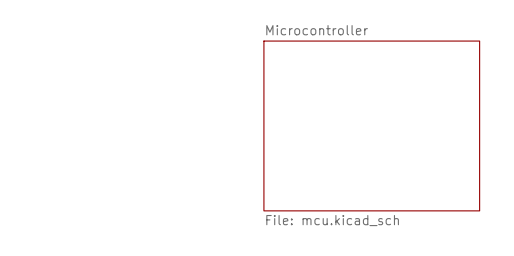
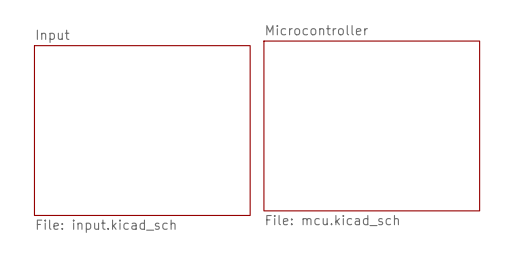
sheet Input: none -> File: input.kicad_sch (142, 130)

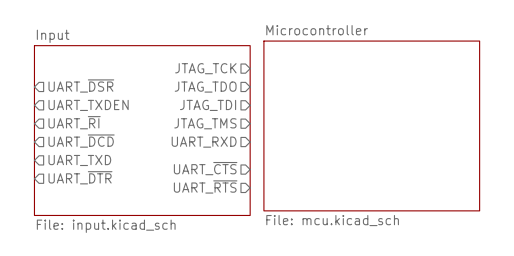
sheet pin: none -> JTAG_TCK (205, 68)
sheet pin: none -> UART_~{DSR} (81, 85)
sheet pin: none -> JTAG_TDO (205, 87)
sheet pin: none -> UART_TXDEN (88, 105)
sheet pin: none -> JTAG_TDI (208, 105)
sheet pin: none -> UART_~{RI} (74, 122)
sheet pin: none -> JTAG_TMS (205, 123)
sheet pin: none -> UART_~{DCD} (81, 141)
sheet pin: none -> UART_RXD (204, 142)
sheet pin: none -> UART_TXD (79, 160)
sheet pin: none -> UART_~{CTS} (205, 168)
sheet pin: none -> UART_~{DTR} (80, 177)
sheet pin: none -> UART_~{RTS} (205, 186)

